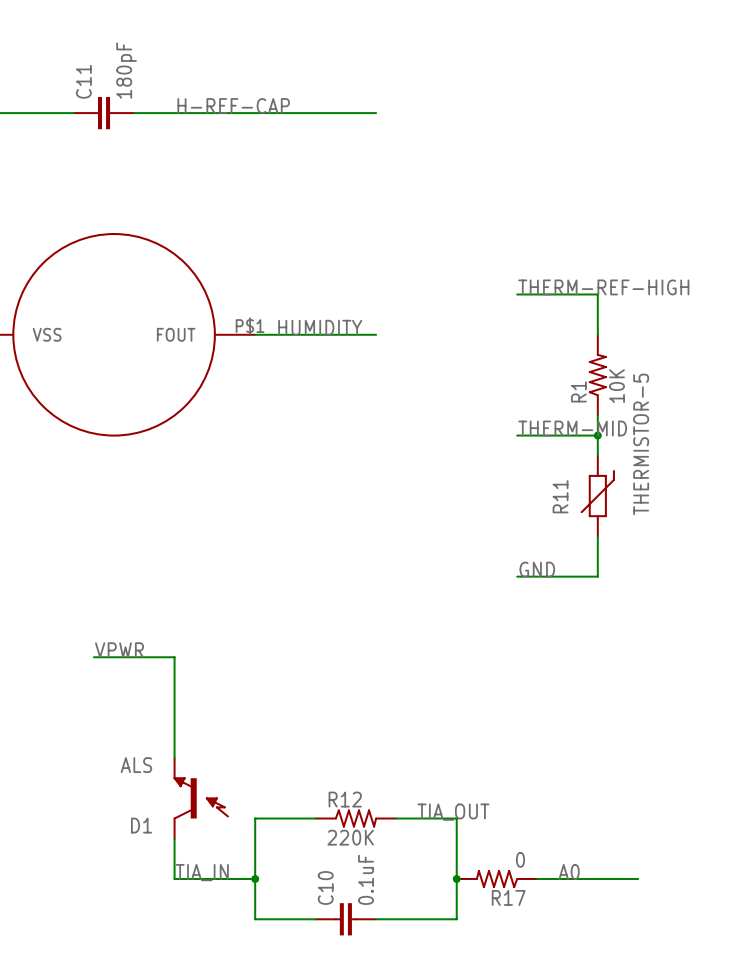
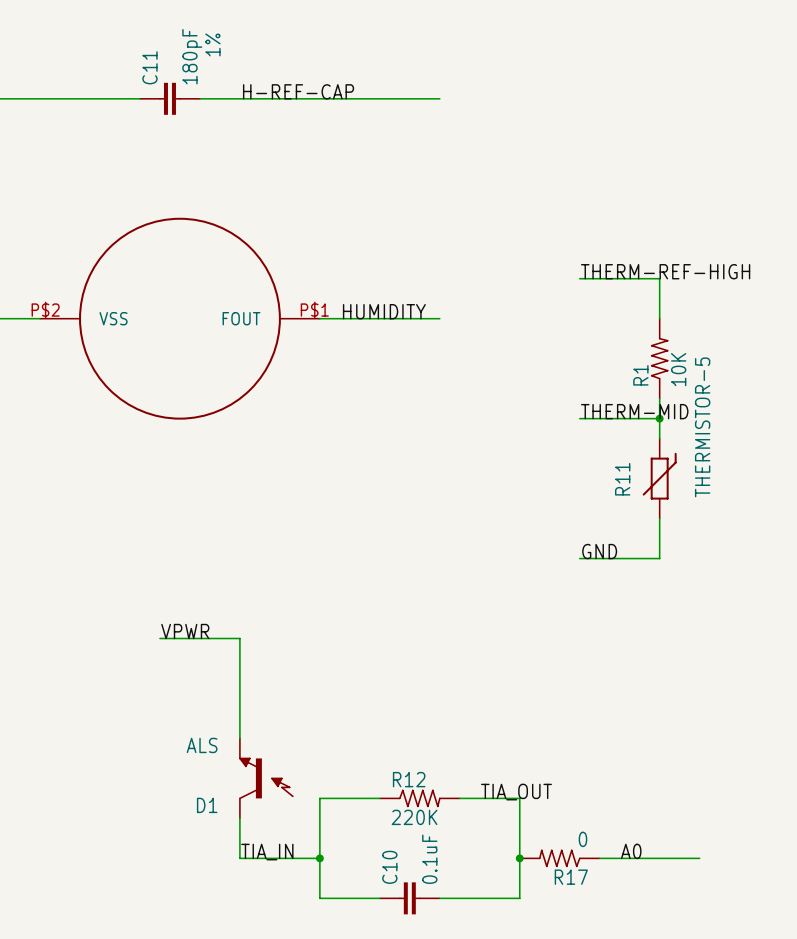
text: none -> 1% (212, 44)

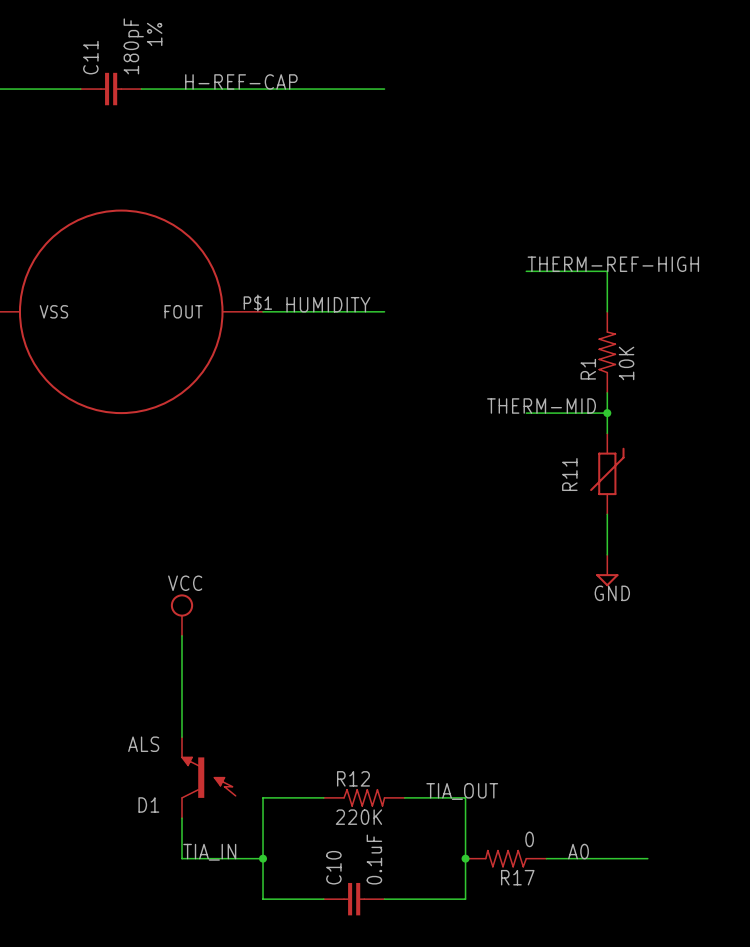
label position: THERM-MID (634, 411) -> THERM-MID (541, 406)
R11 value: THERMISTOR-5 (702, 427) -> none
label: GND (599, 551) -> none
wire: (579, 558) (659, 558) -> none
power symbol: none -> GND (607, 570)
power symbol: none -> VCC (182, 615)
label: VPWR (185, 631) -> none
wire: (159, 638) (239, 638) -> none

